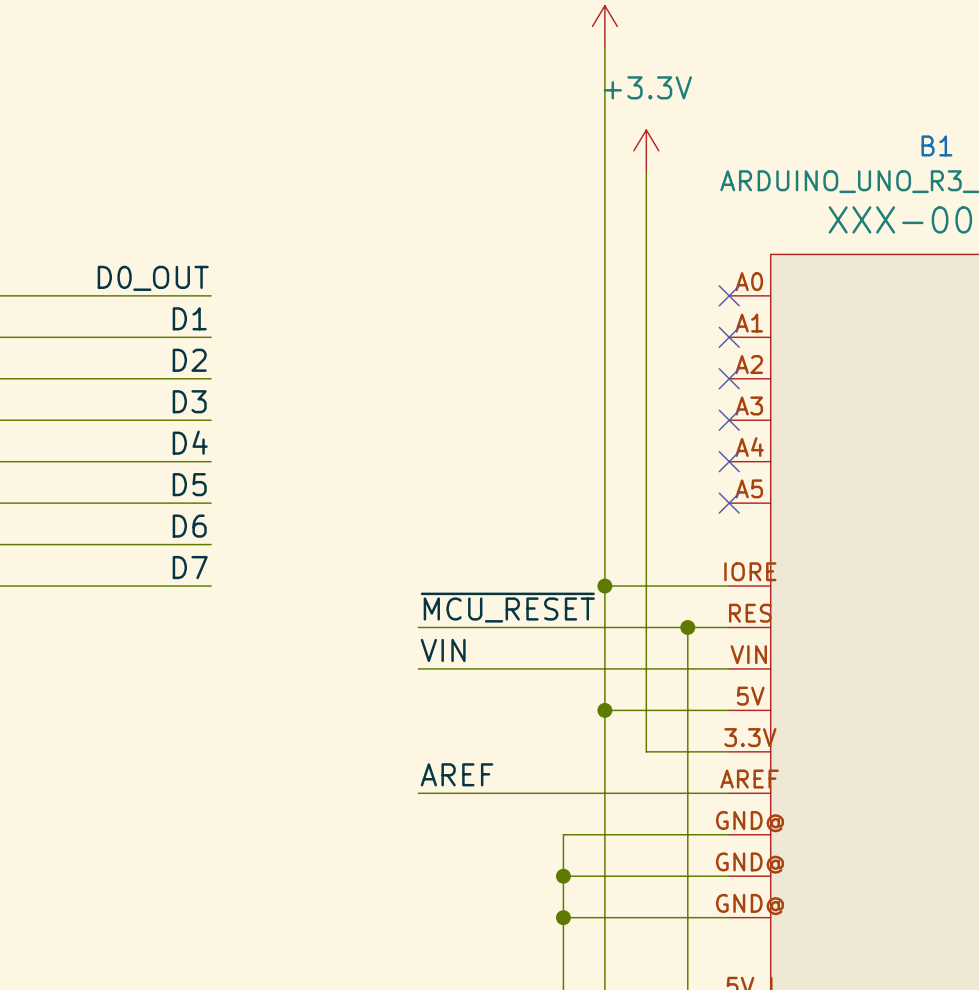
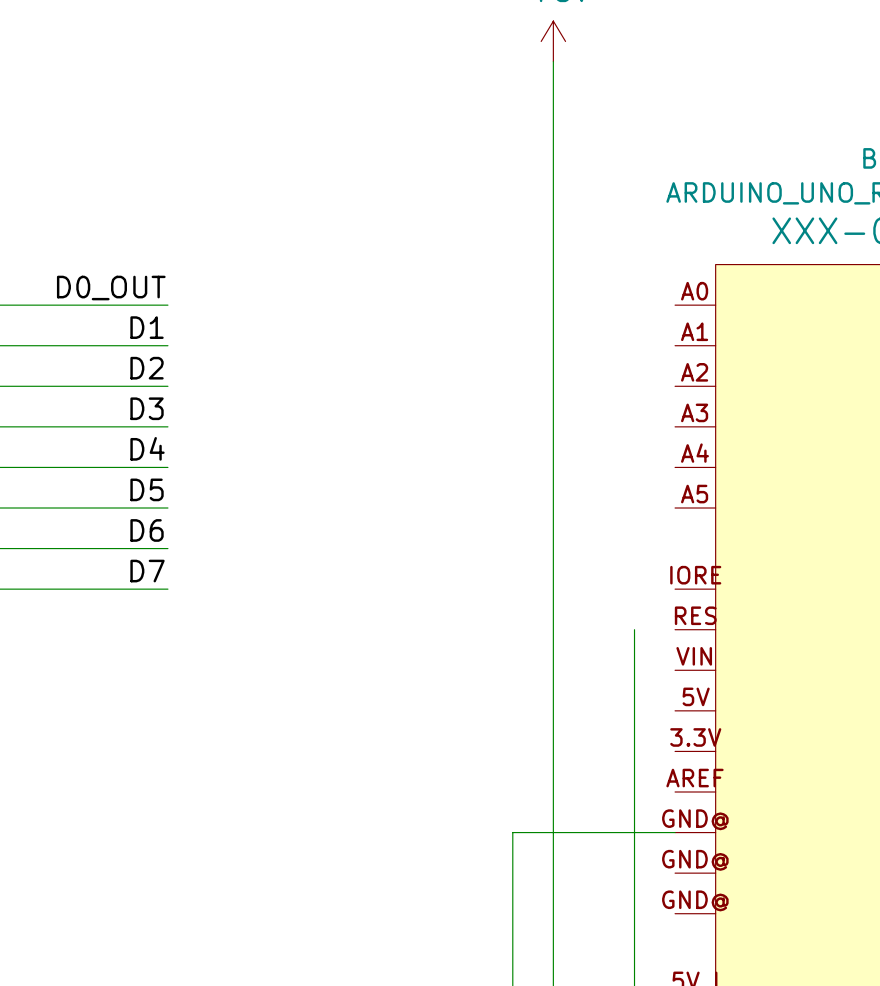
power symbol: +3.3V (646, 150) -> none
wire: (646, 171) (646, 751) (729, 751) -> none
no-connect mark: (729, 295) -> none
no-connect mark: (729, 337) -> none
no-connect mark: (729, 378) -> none
no-connect mark: (729, 420) -> none
no-connect mark: (729, 461) -> none
no-connect mark: (729, 503) -> none
wire: (604, 586) (729, 586) -> none
junction: (604, 586) -> none
label: ~{MCU_RESET} (507, 607) -> none
wire: (418, 627) (729, 627) -> none
junction: (687, 627) -> none
label: VIN (443, 650) -> none
wire: (418, 668) (729, 668) -> none
wire: (604, 710) (729, 710) -> none
junction: (604, 710) -> none
label: AREF (456, 774) -> none
wire: (418, 793) (729, 793) -> none
wire: (563, 876) (729, 876) -> none
junction: (563, 876) -> none
wire: (563, 917) (729, 917) -> none
junction: (563, 917) -> none

